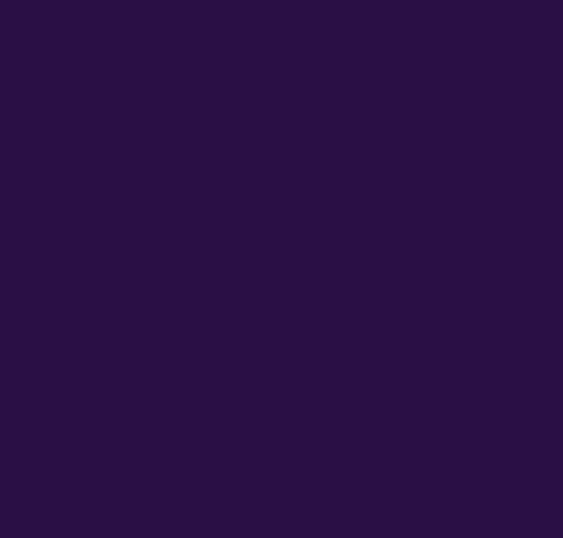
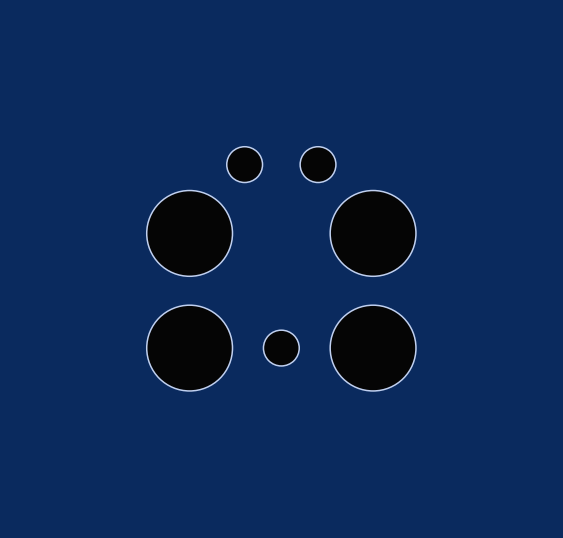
part: none -> (281, 268)

